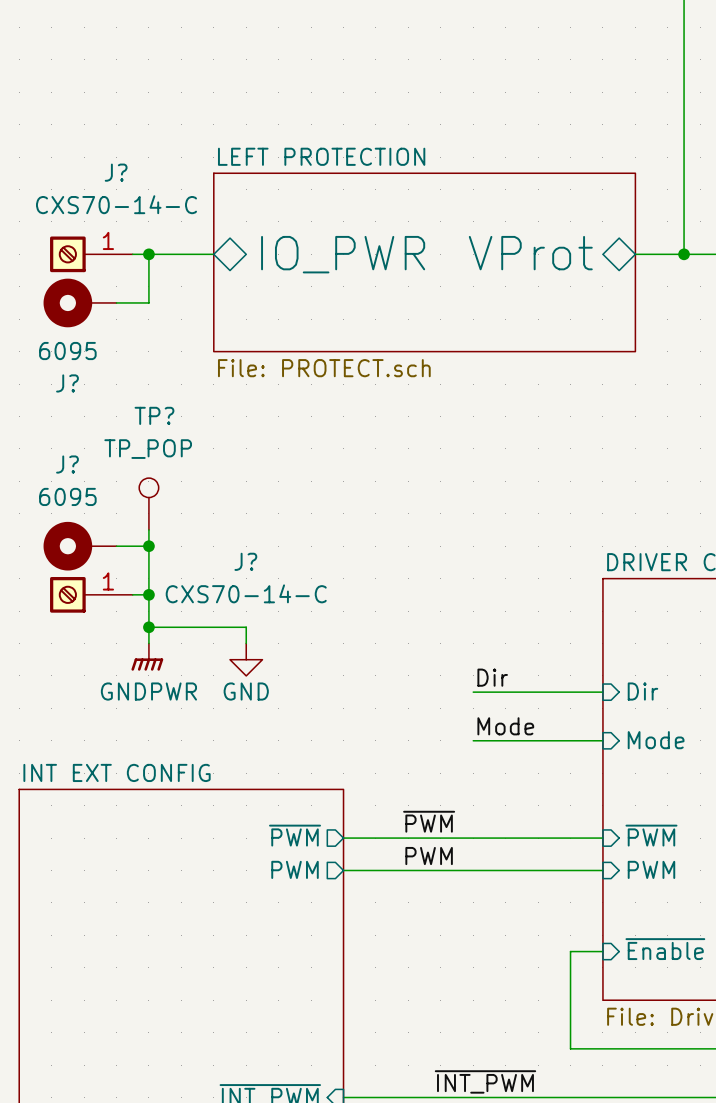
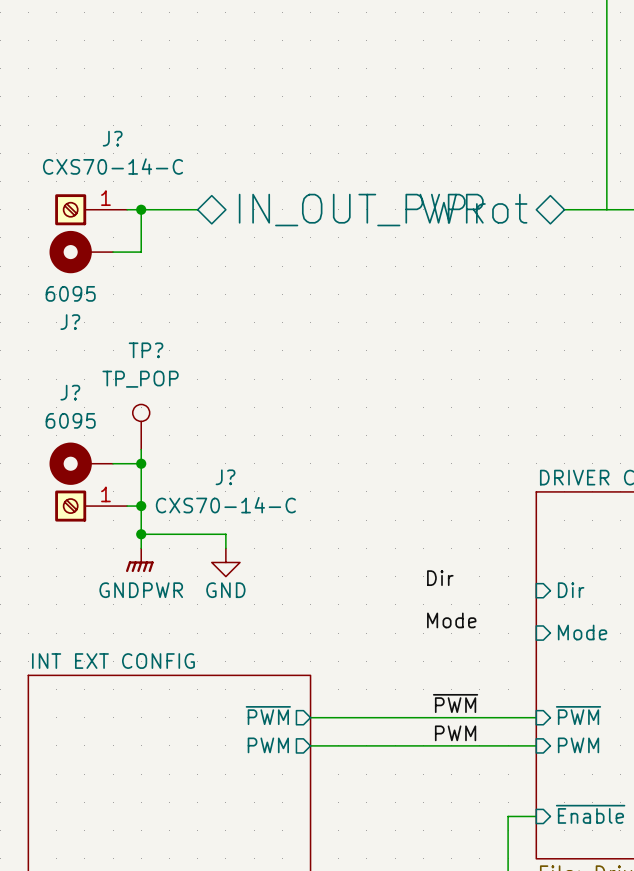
sheet pin: IO_PWR (343, 254) -> IN_OUT_PWR (361, 210)
junction: (684, 254) -> none
sheet LEFT PROTECTION: File: PROTECT.sch (424, 262) -> none
wire: (473, 692) (602, 692) -> none
wire: (473, 740) (602, 740) -> none
label position: ~{PWM} (429, 821) -> ~{PWM} (455, 703)
label position: PWM (429, 856) -> PWM (455, 733)

